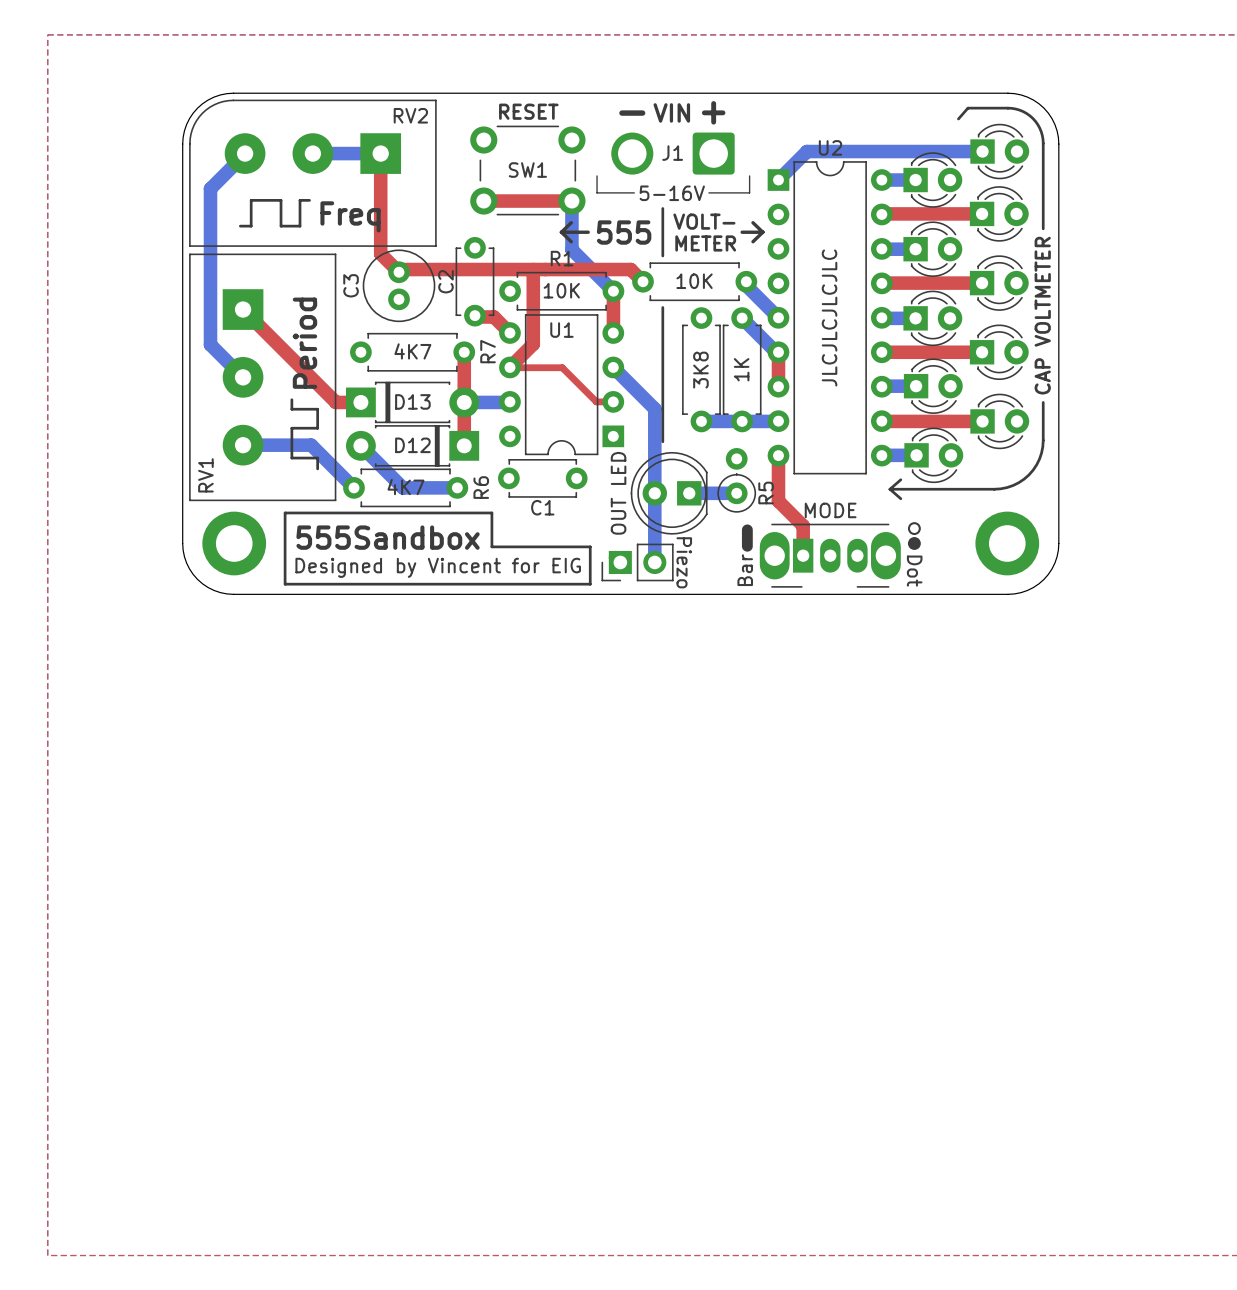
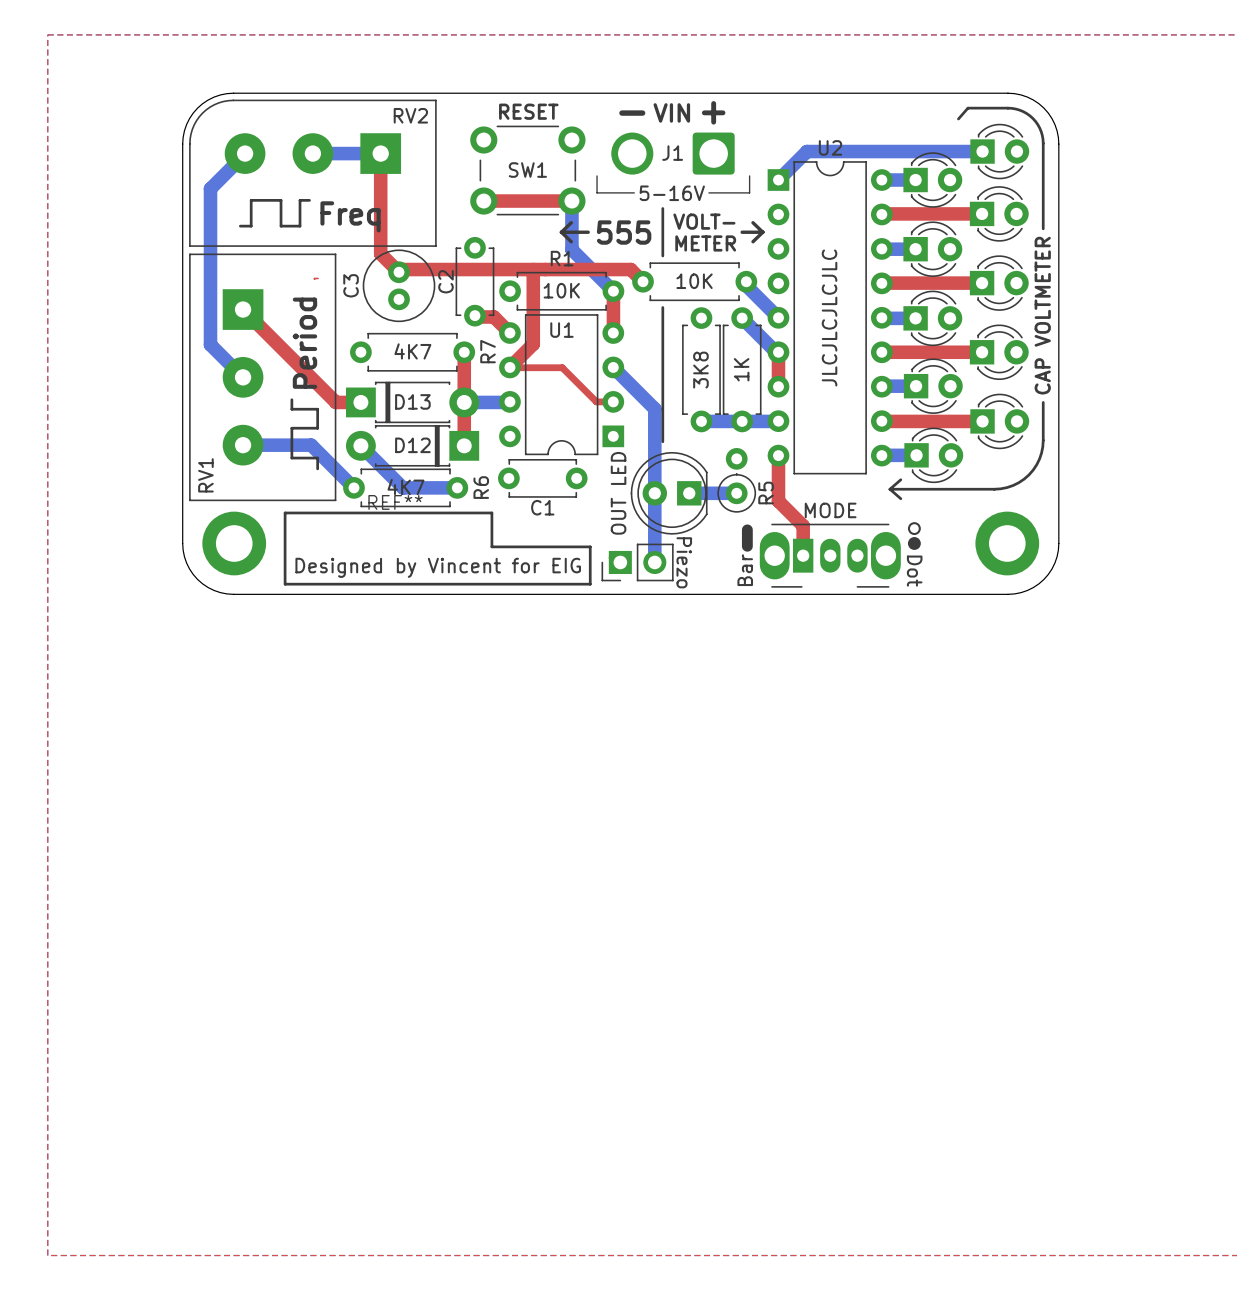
part: none -> (316, 278)
REF**: none -> (395, 502)
text: 555Sandbox (388, 537) -> none

